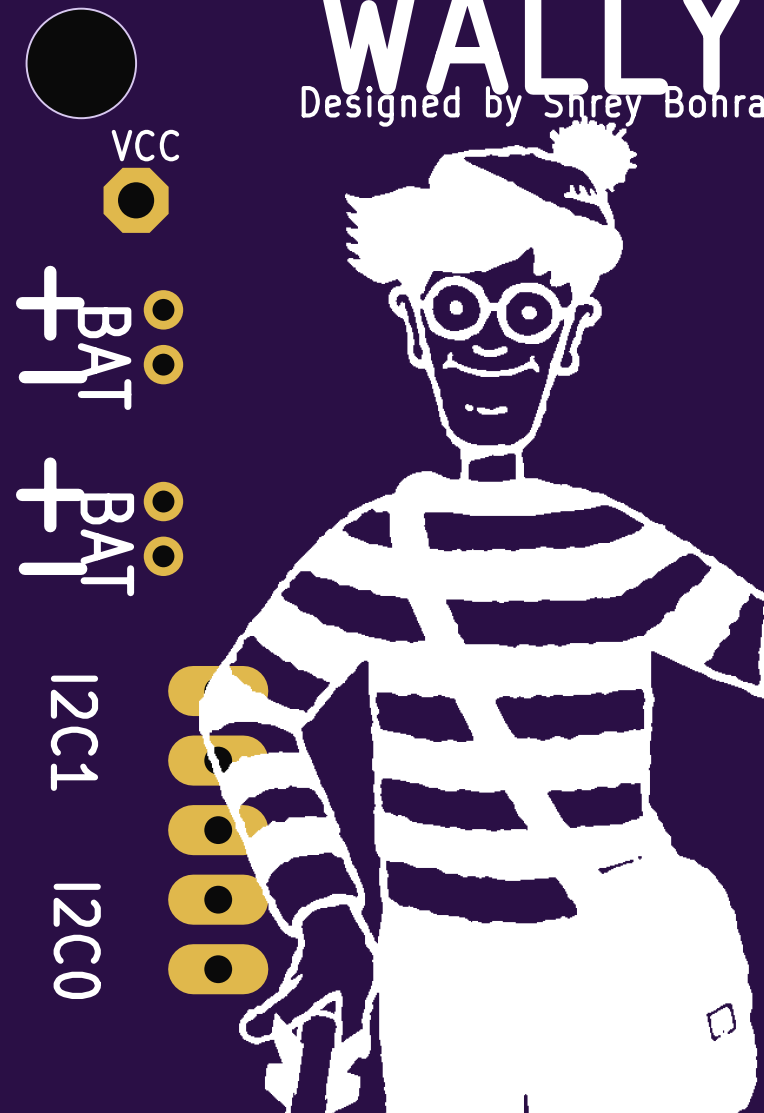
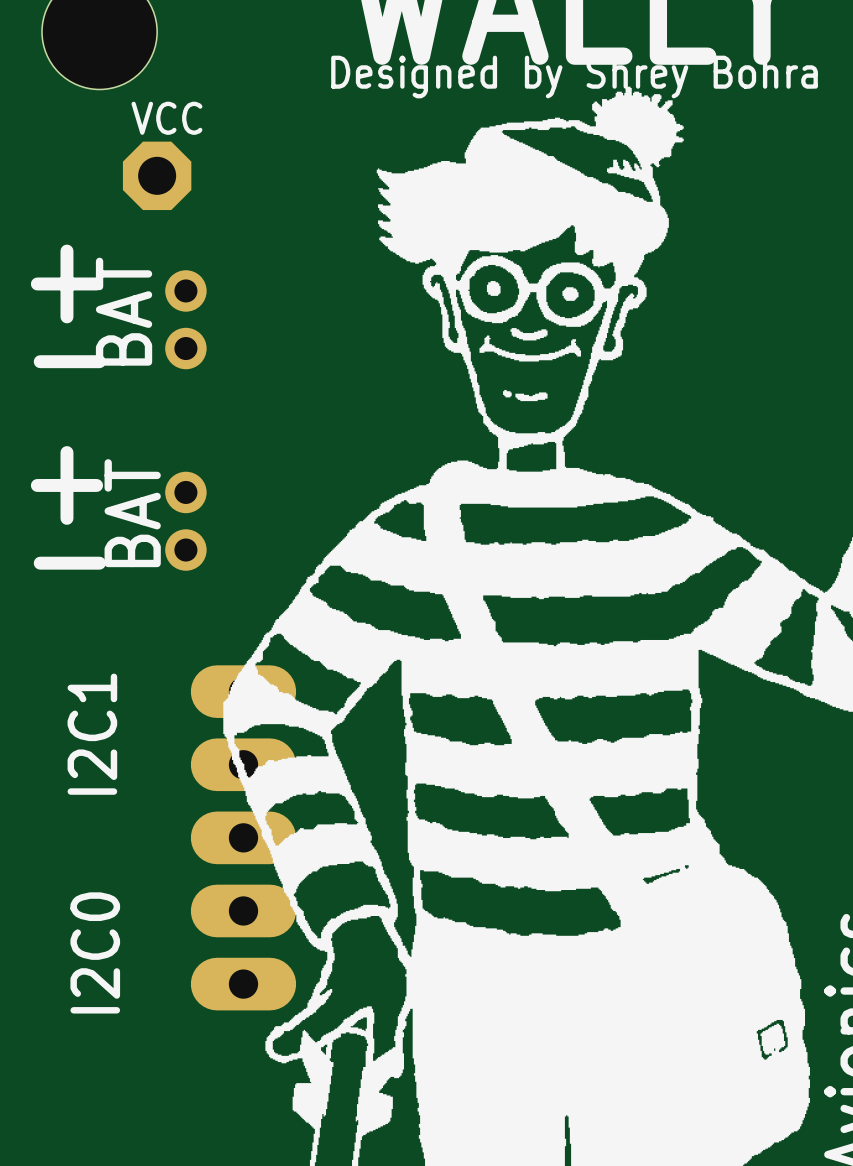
text rotation: 0° (104, 358) -> 180° (124, 311)
text rotation: 0° (107, 544) -> 180° (132, 513)
text rotation: 0° (74, 733) -> 180° (92, 734)
text rotation: 0° (77, 941) -> 180° (95, 952)

